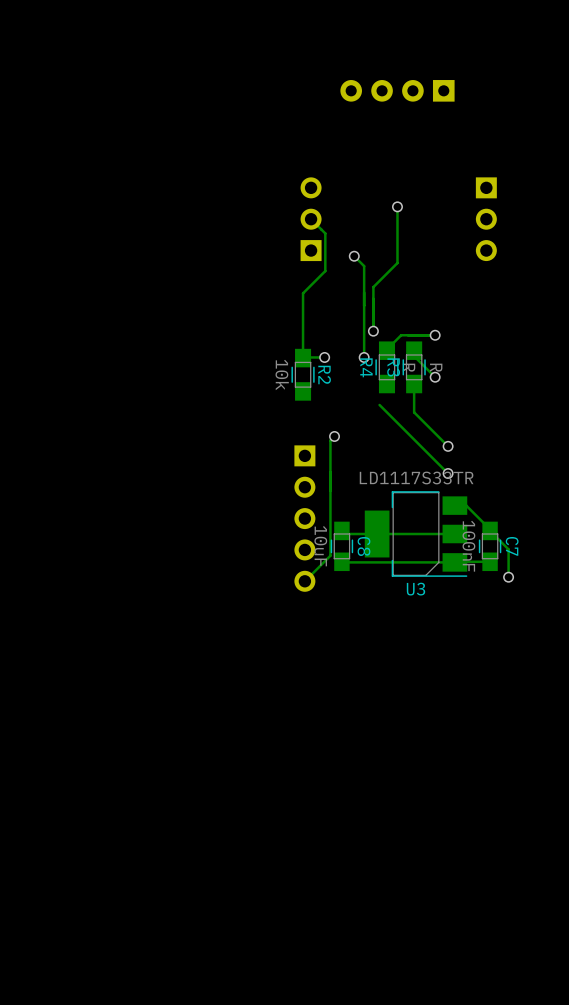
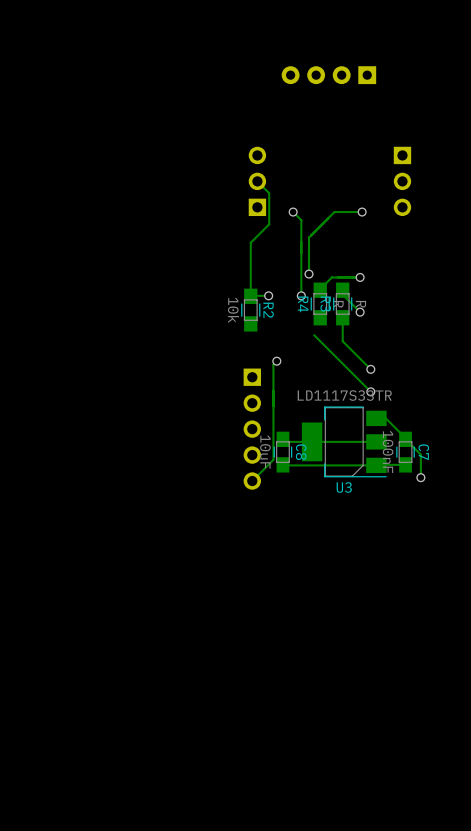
track: (397, 206) (397, 263) -> (362, 212) (334, 212) (328, 217)
via position: (397, 206) -> (362, 212)

